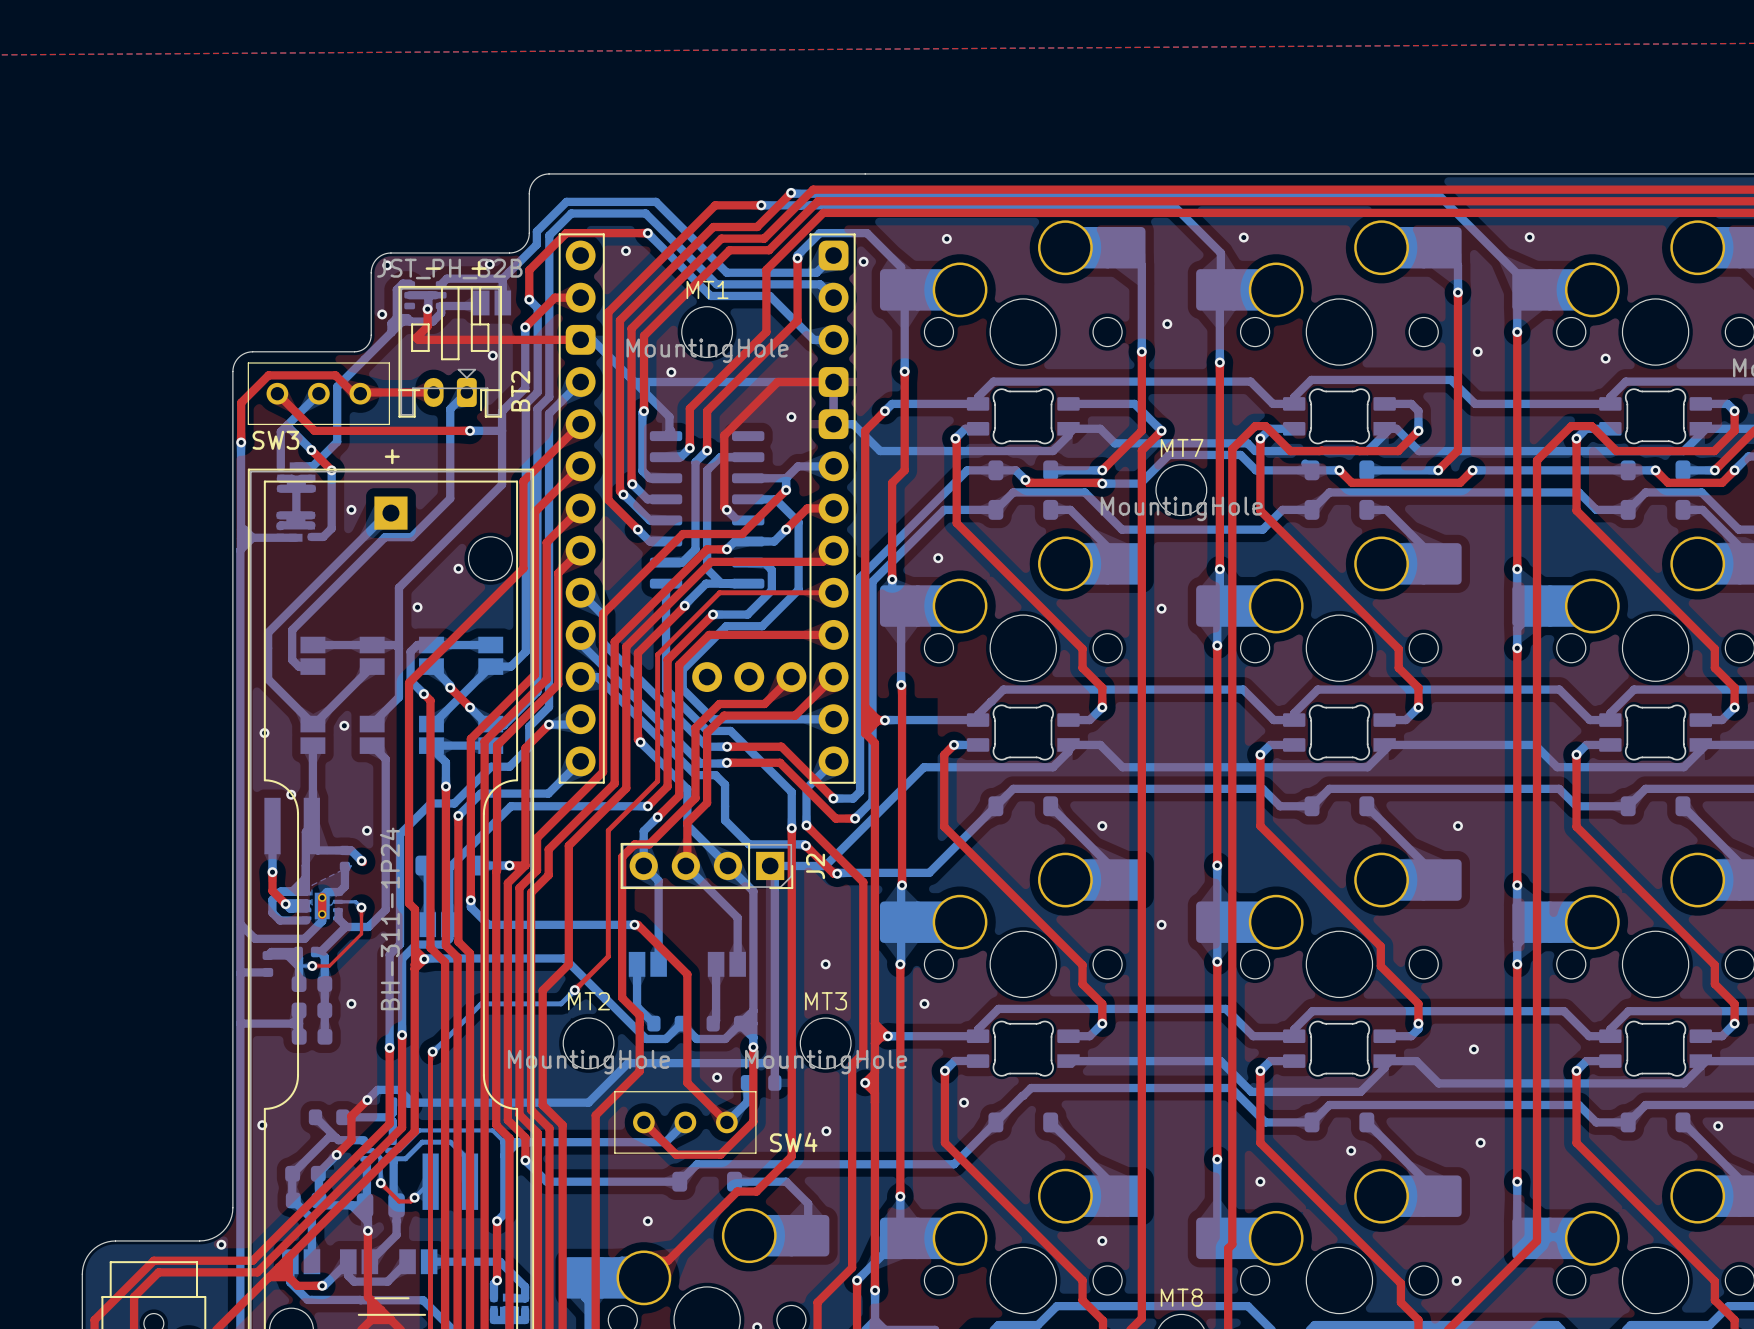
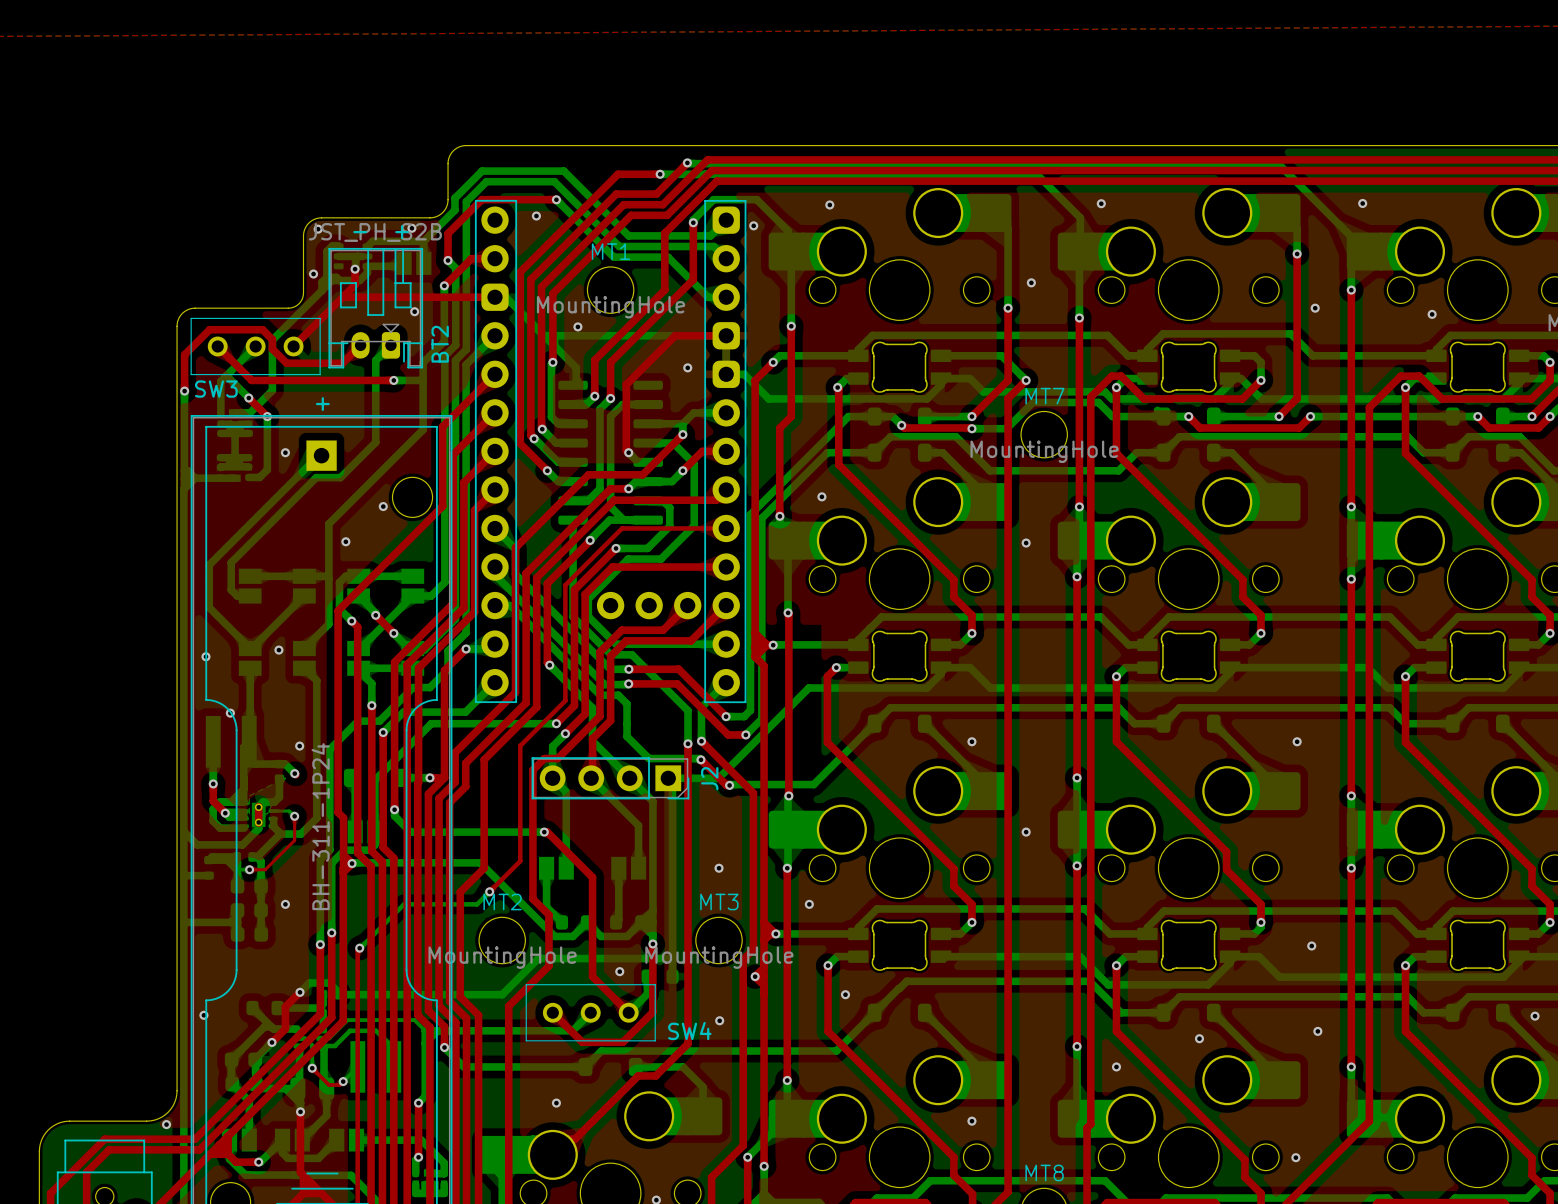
top track: none -> (344, 295) (294, 345)
top track: (326, 375) (335, 375) (353, 393) (360, 393) -> none
top track: (361, 392) (433, 392) -> (262, 329) (272, 339) (272, 348) (286, 363) (342, 363) (360, 345)

